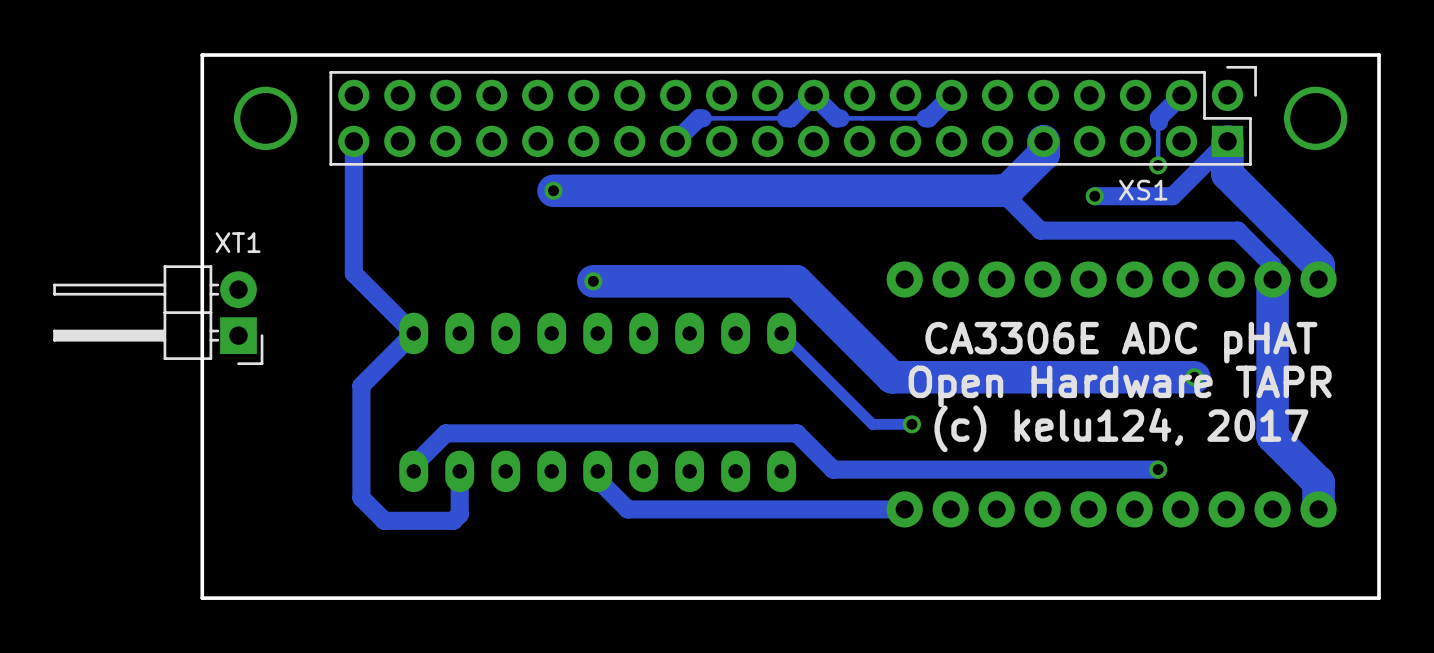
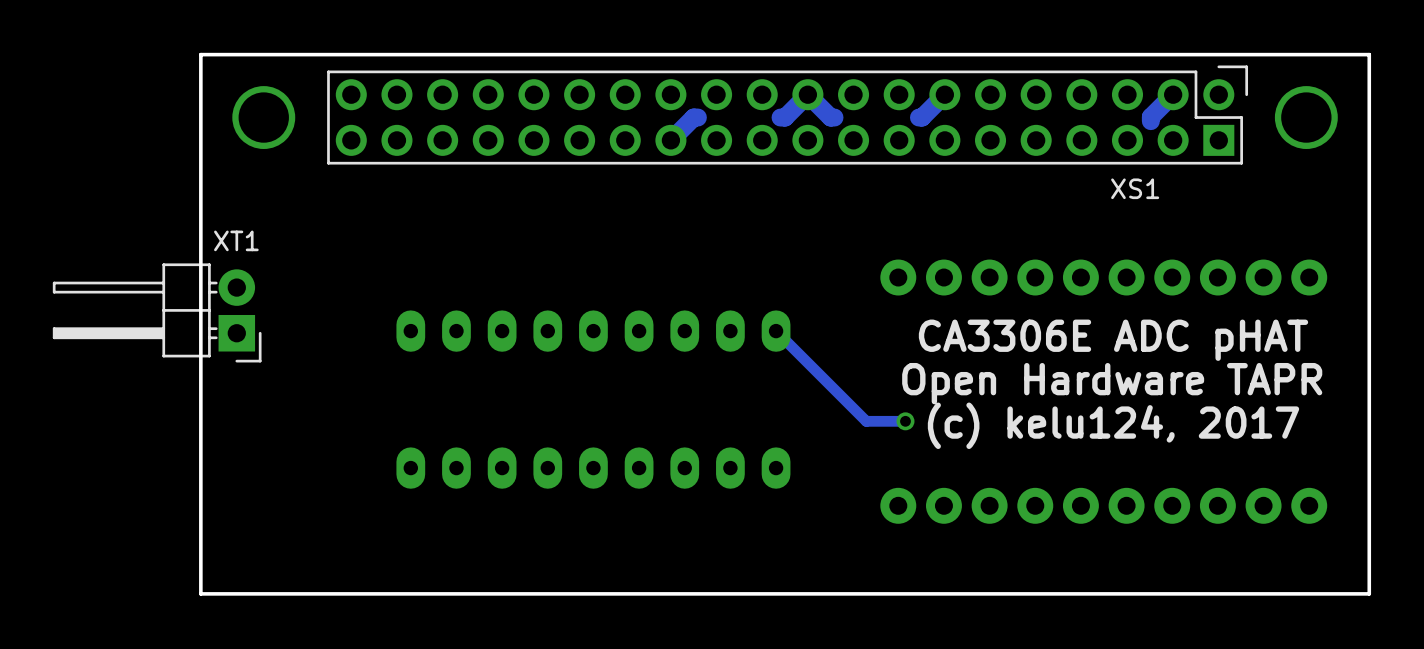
track: (1159, 117) (1158, 165) -> none
track: (790, 118) (698, 118) -> none
track: (928, 118) (836, 118) -> none
track: (353, 141) (353, 273) (413, 333) (361, 385) (361, 497) (384, 520) (453, 520) (459, 514) (459, 471) -> none
track: (1043, 141) (1043, 154) (1006, 190) (553, 190) -> none
via: (1158, 165) -> none
via: (553, 190) -> none
track: (1000, 190) (1040, 230) (1237, 230) (1272, 265) (1272, 436) (1318, 482) (1318, 509) -> none
track: (1094, 196) (1172, 196) (1227, 141) (1227, 174) (1318, 265) (1318, 279) -> none
via: (1094, 196) -> none
track: (593, 281) (796, 281) (892, 377) (1194, 377) -> none
via: (593, 281) -> none
via: (1194, 377) -> none
track: (413, 465) (445, 433) (796, 433) (833, 469) (1158, 469) -> none
via: (1158, 469) -> none
track: (597, 471) (597, 479) (627, 509) (904, 509) -> none

